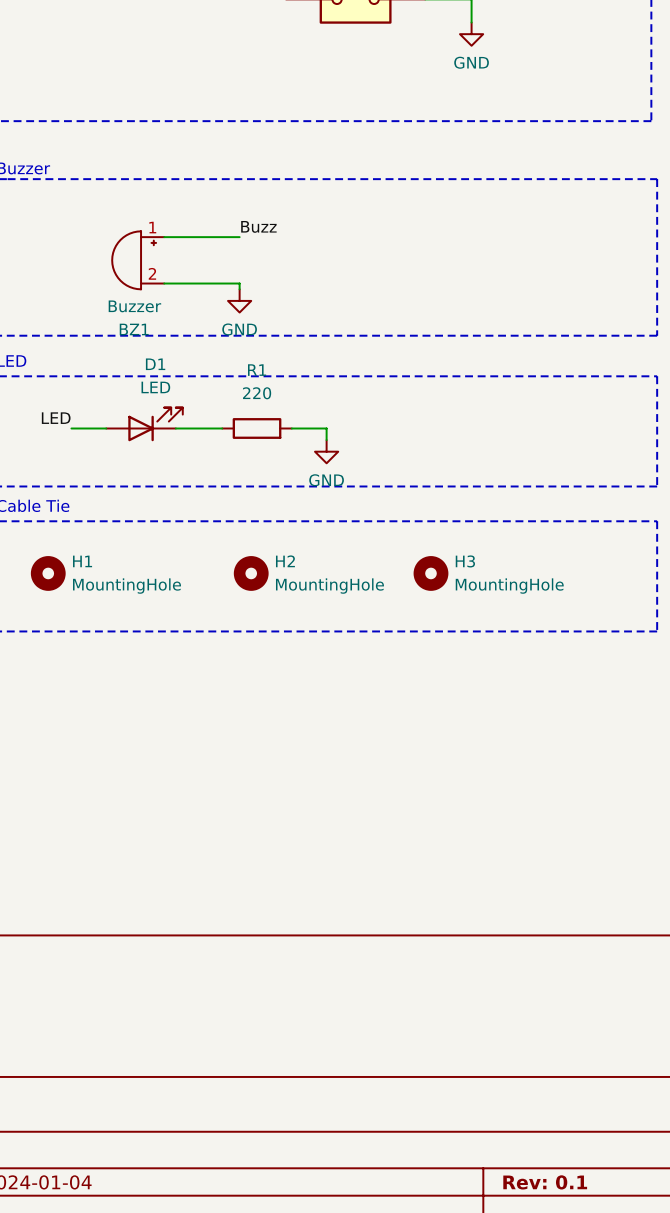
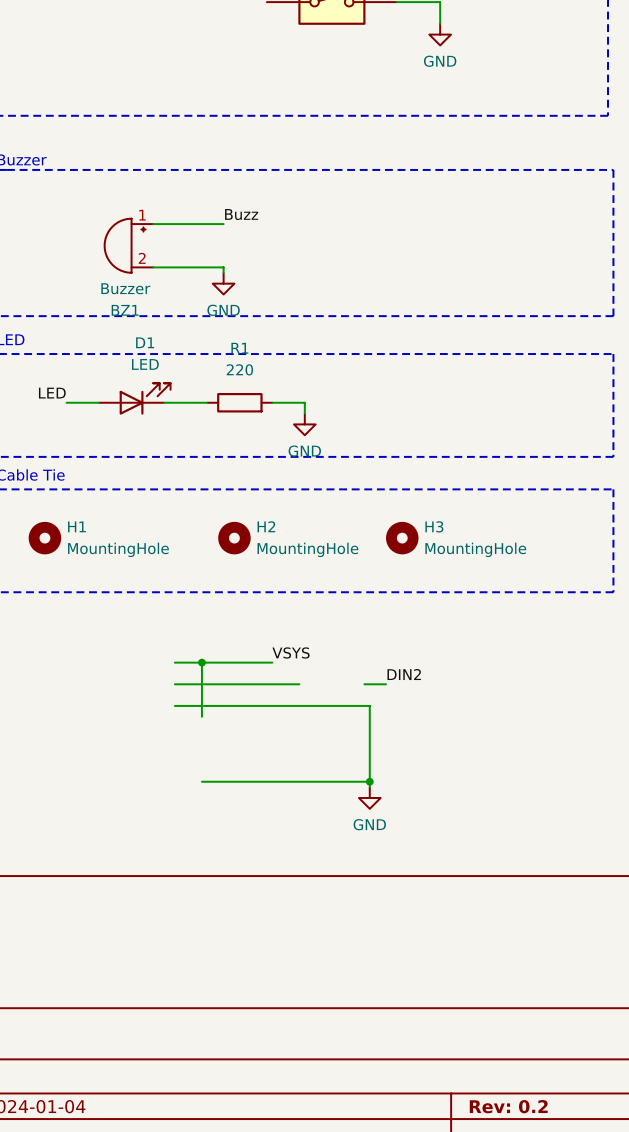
label: none -> VSYS (291, 652)
wire: none -> (174, 662) (272, 662)
wire: none -> (201, 662) (201, 716)
junction: none -> (201, 662)
label: none -> DIN2 (404, 674)
wire: none -> (174, 684) (299, 684)
wire: none -> (364, 684) (386, 684)
wire: none -> (174, 705) (369, 705) (369, 787)
wire: none -> (201, 781) (369, 781)
junction: none -> (369, 781)
power symbol: none -> GND (369, 797)
title block: Rev: 0.1 (545, 1182) -> Rev: 0.2 (508, 1106)

